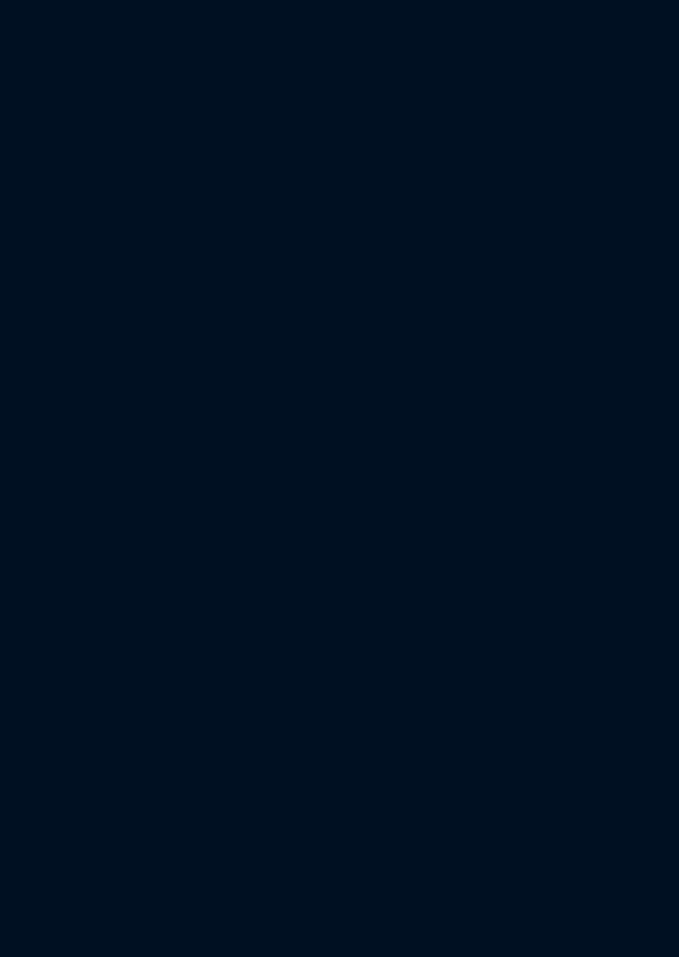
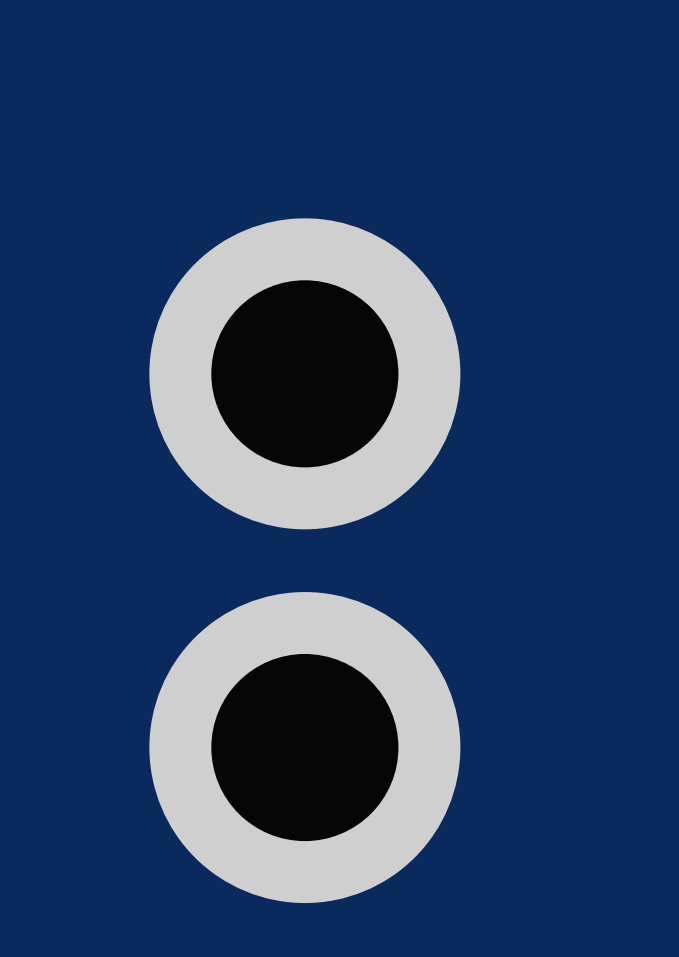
part: none -> (304, 373)
part: none -> (304, 747)

